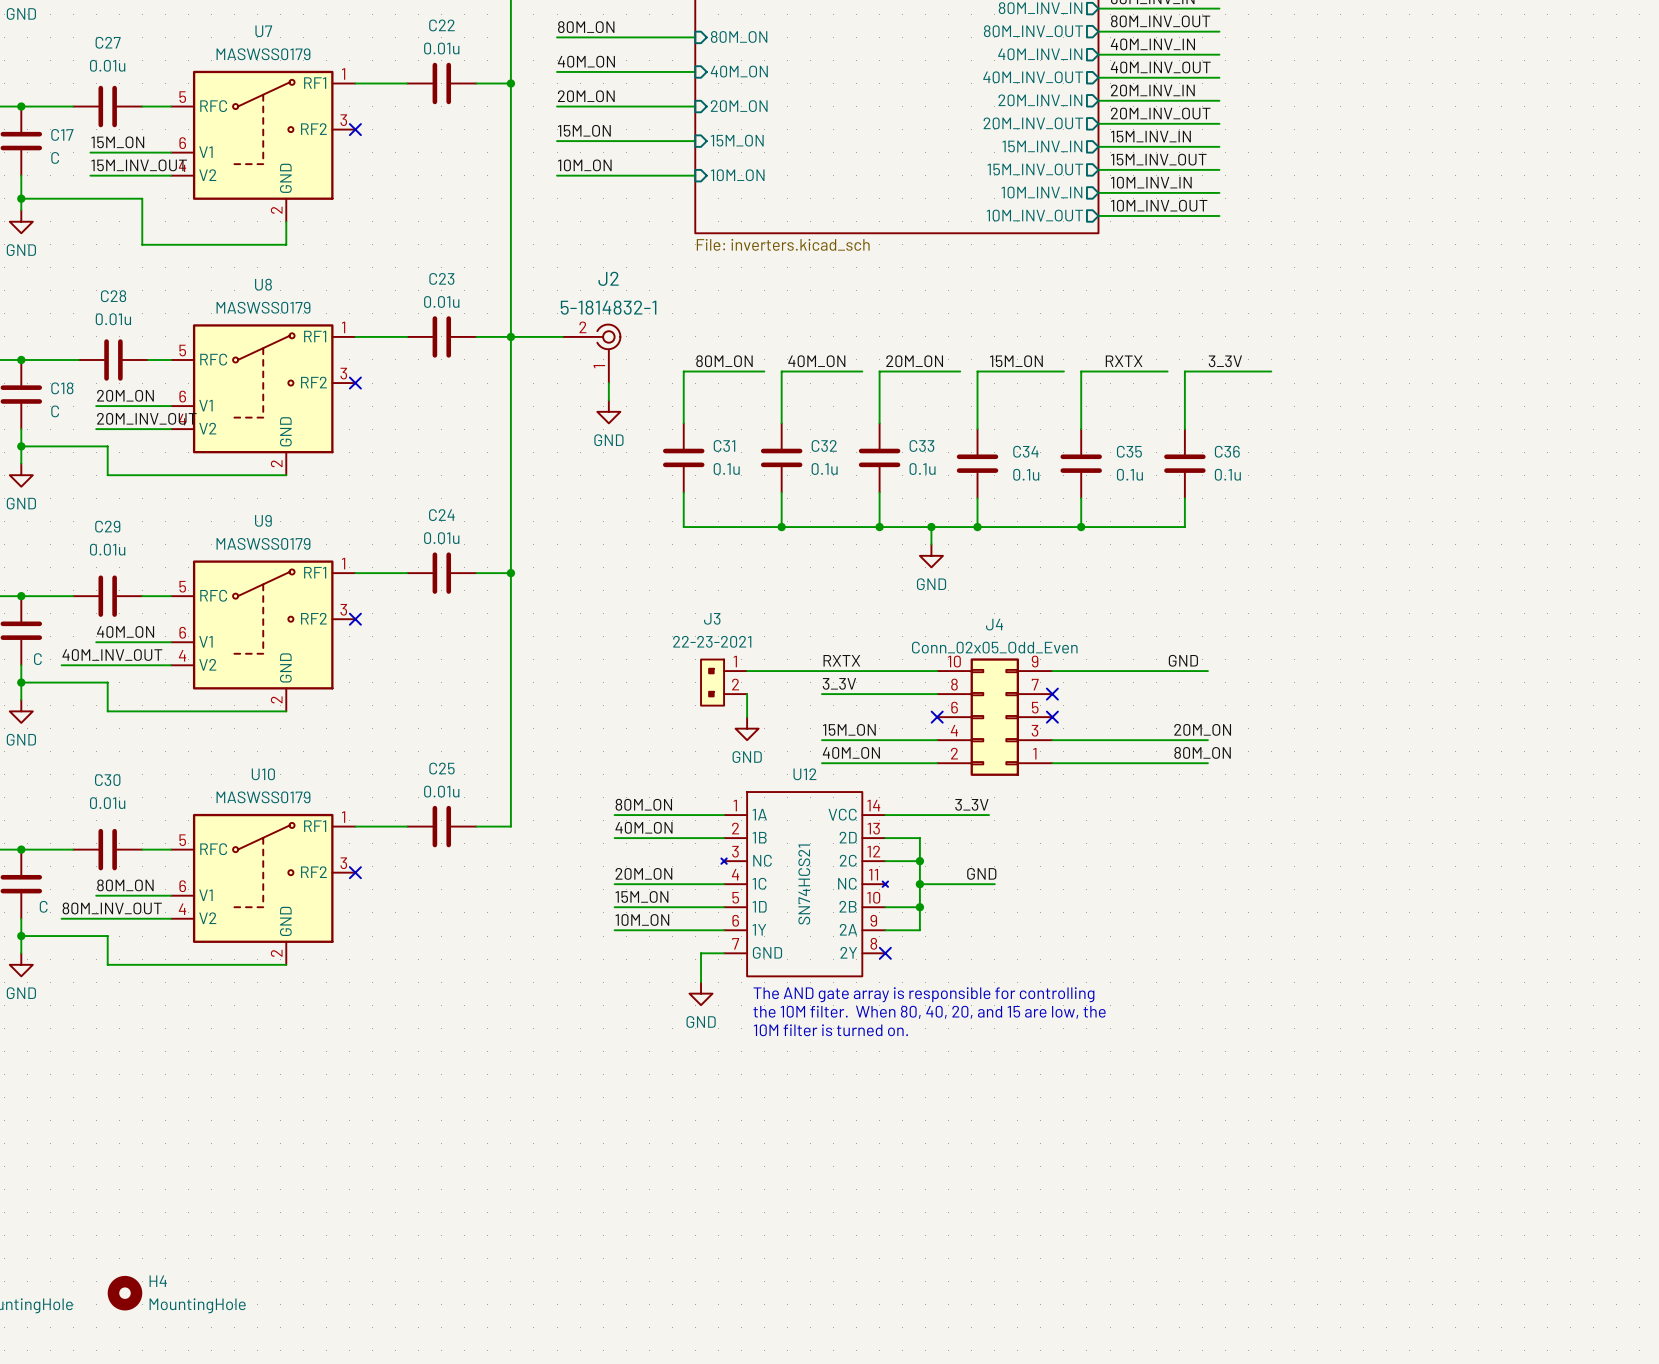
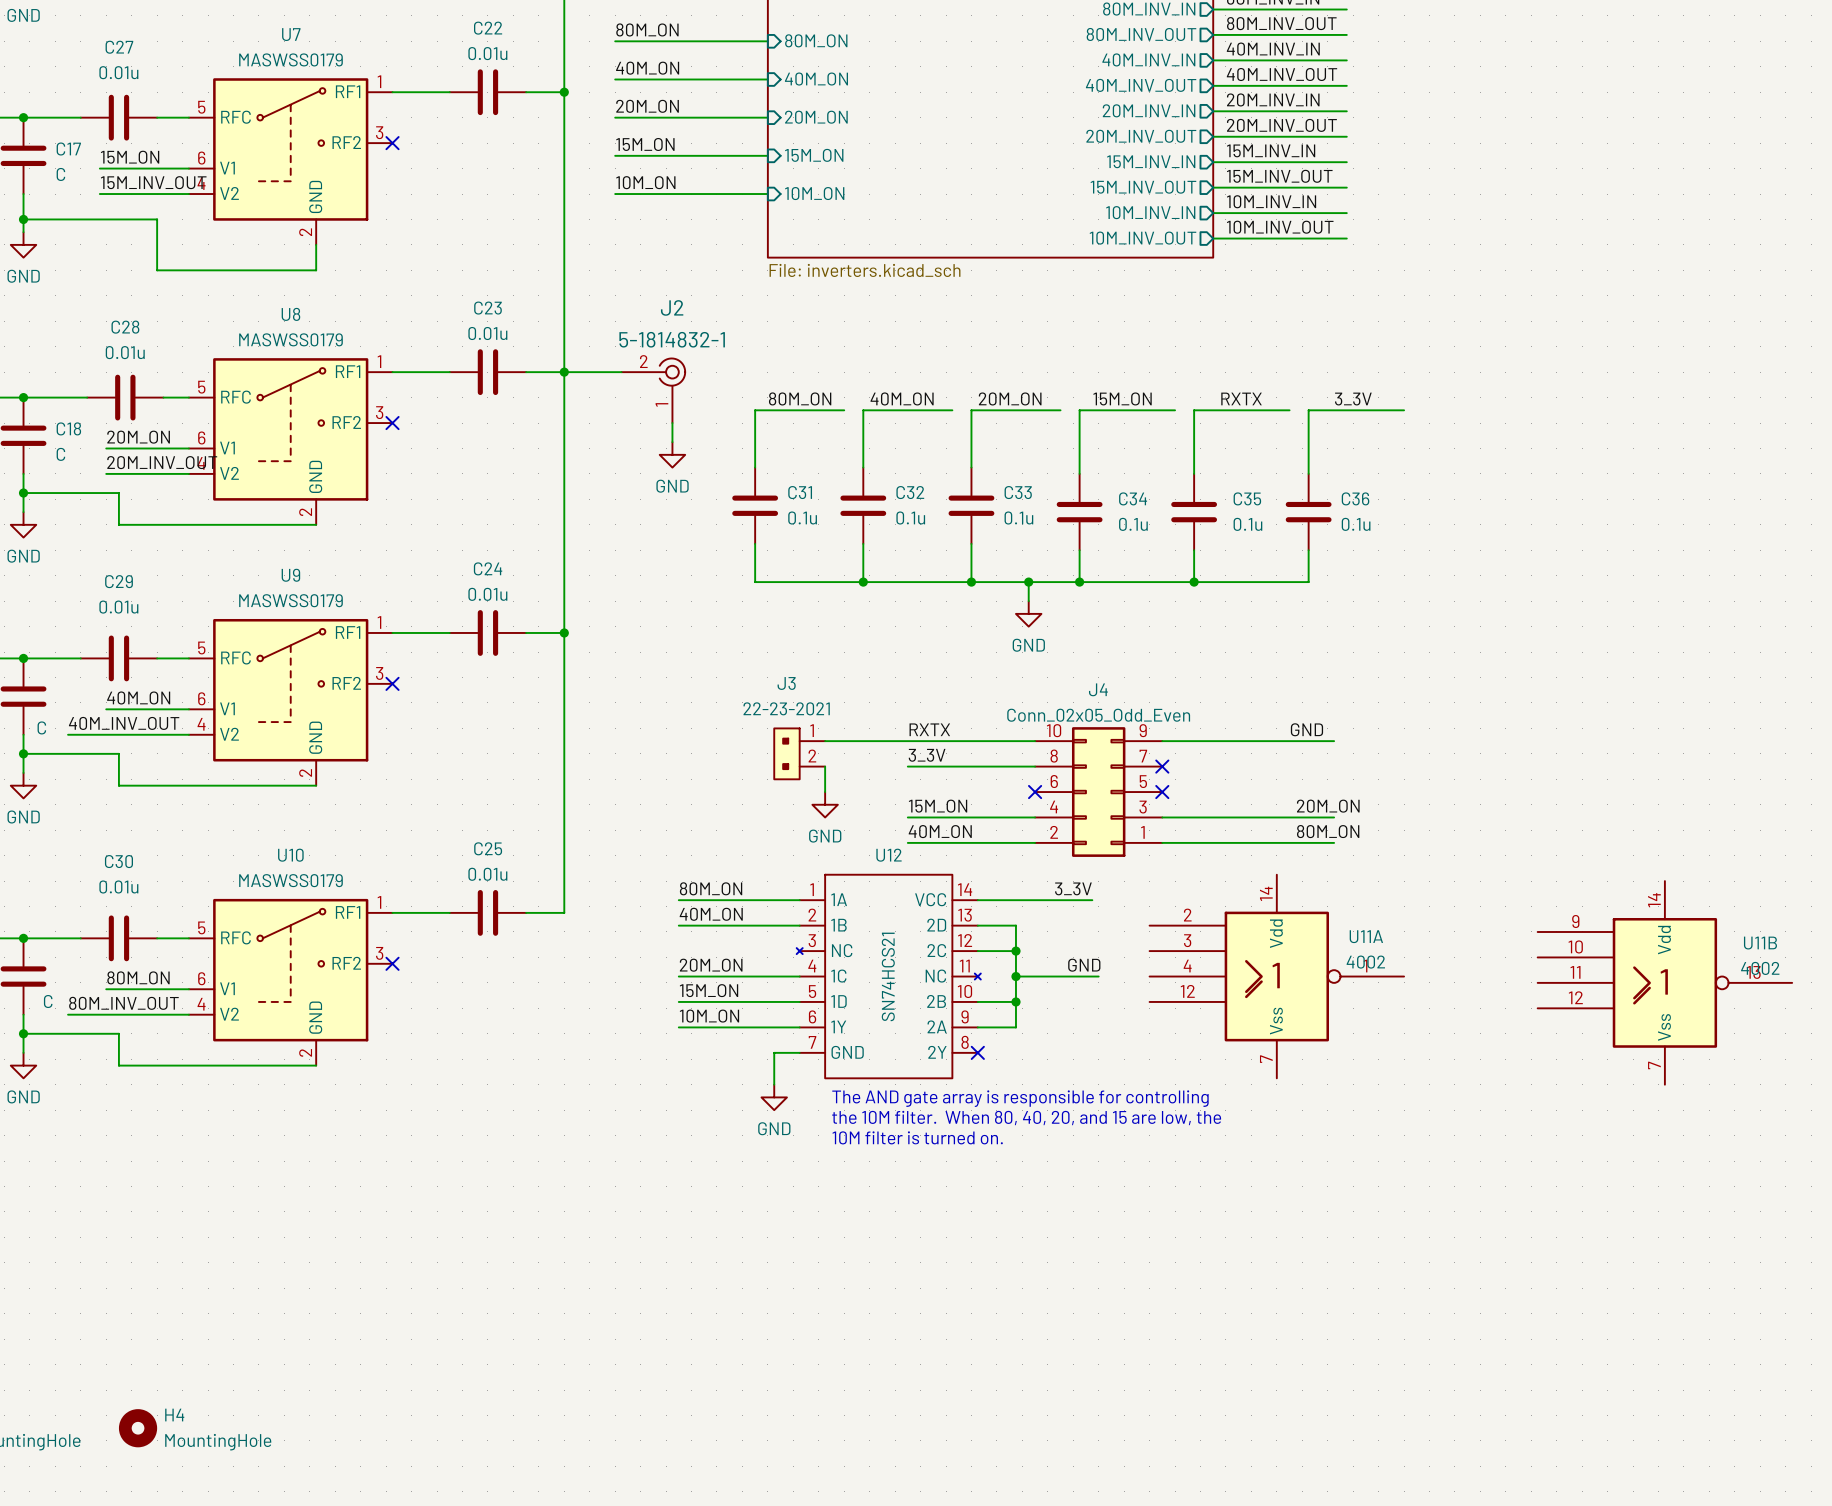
U11A: none -> 4002 (1276, 976)
U11B: none -> 4002 (1664, 982)

